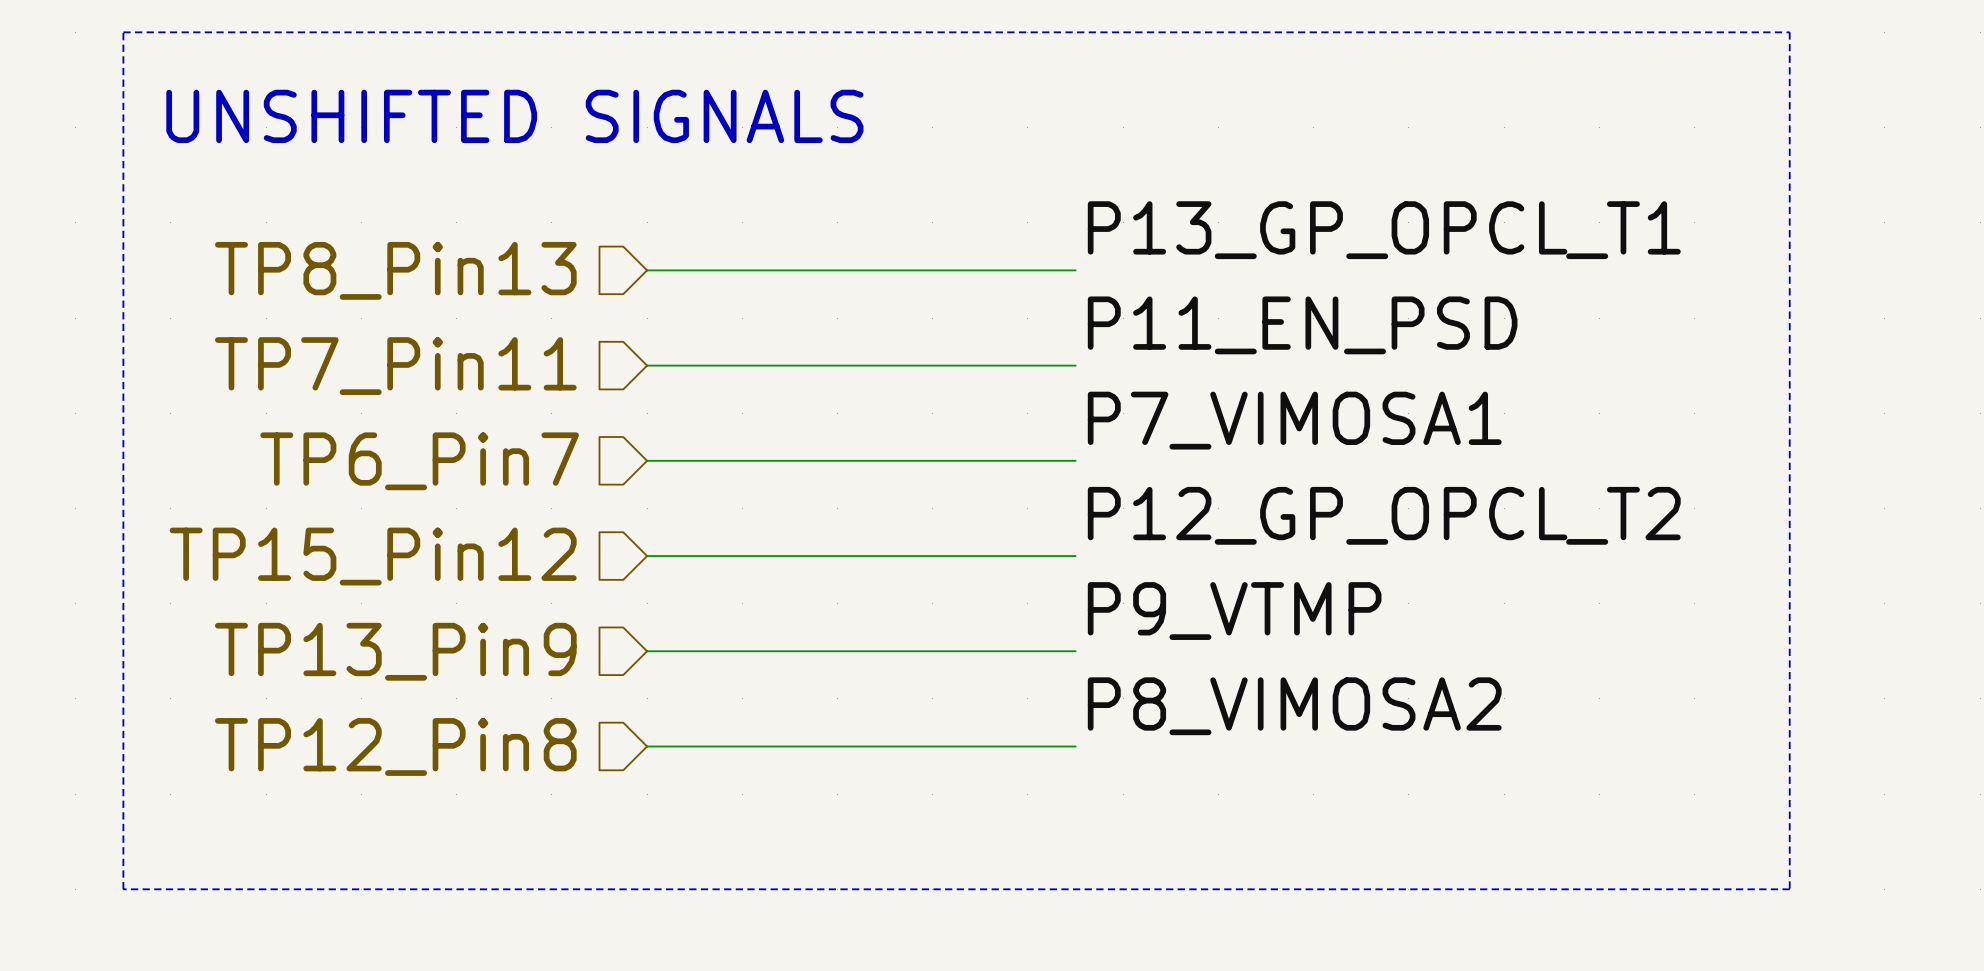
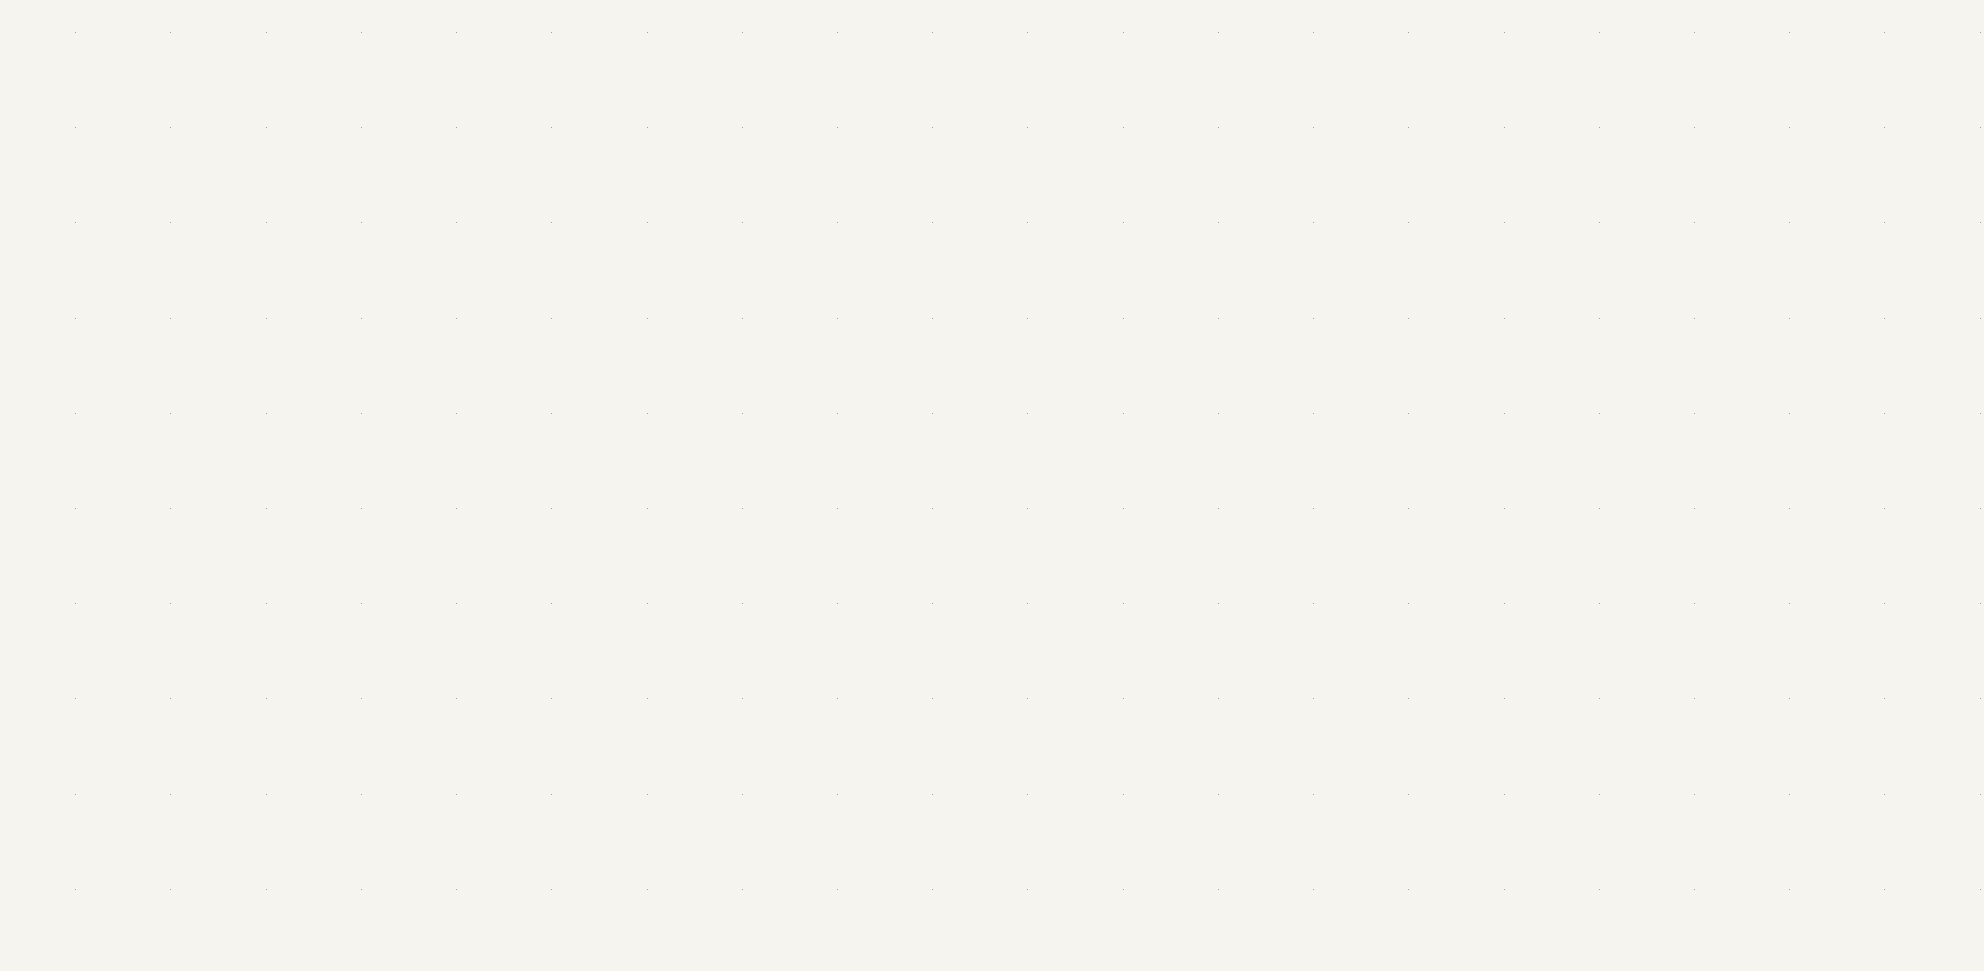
line: (123, 32) (1789, 32) (1789, 889) (123, 889) (123, 32) -> none
text: UNSHIFTED SIGNALS (514, 116) -> none
label: P13_GP_OPCL_T1 (1384, 230) -> none
hierarchical label: TP8_Pin13 (395, 270) -> none
wire: (647, 270) (1075, 270) -> none
label: P11_EN_PSD (1302, 325) -> none
wire: (647, 365) (1075, 365) -> none
hierarchical label: TP7_Pin11 (395, 366) -> none
label: P7_VIMOSA1 (1294, 420) -> none
wire: (647, 460) (1075, 460) -> none
hierarchical label: TP6_Pin7 (419, 461) -> none
label: P12_GP_OPCL_T2 (1384, 515) -> none
hierarchical label: TP15_Pin12 (373, 556) -> none
wire: (647, 556) (1075, 556) -> none
label: P9_VTMP (1234, 611) -> none
hierarchical label: TP13_Pin9 (395, 651) -> none
wire: (647, 651) (1075, 651) -> none
label: P8_VIMOSA2 (1294, 706) -> none
hierarchical label: TP12_Pin8 (395, 746) -> none
wire: (647, 746) (1075, 746) -> none

